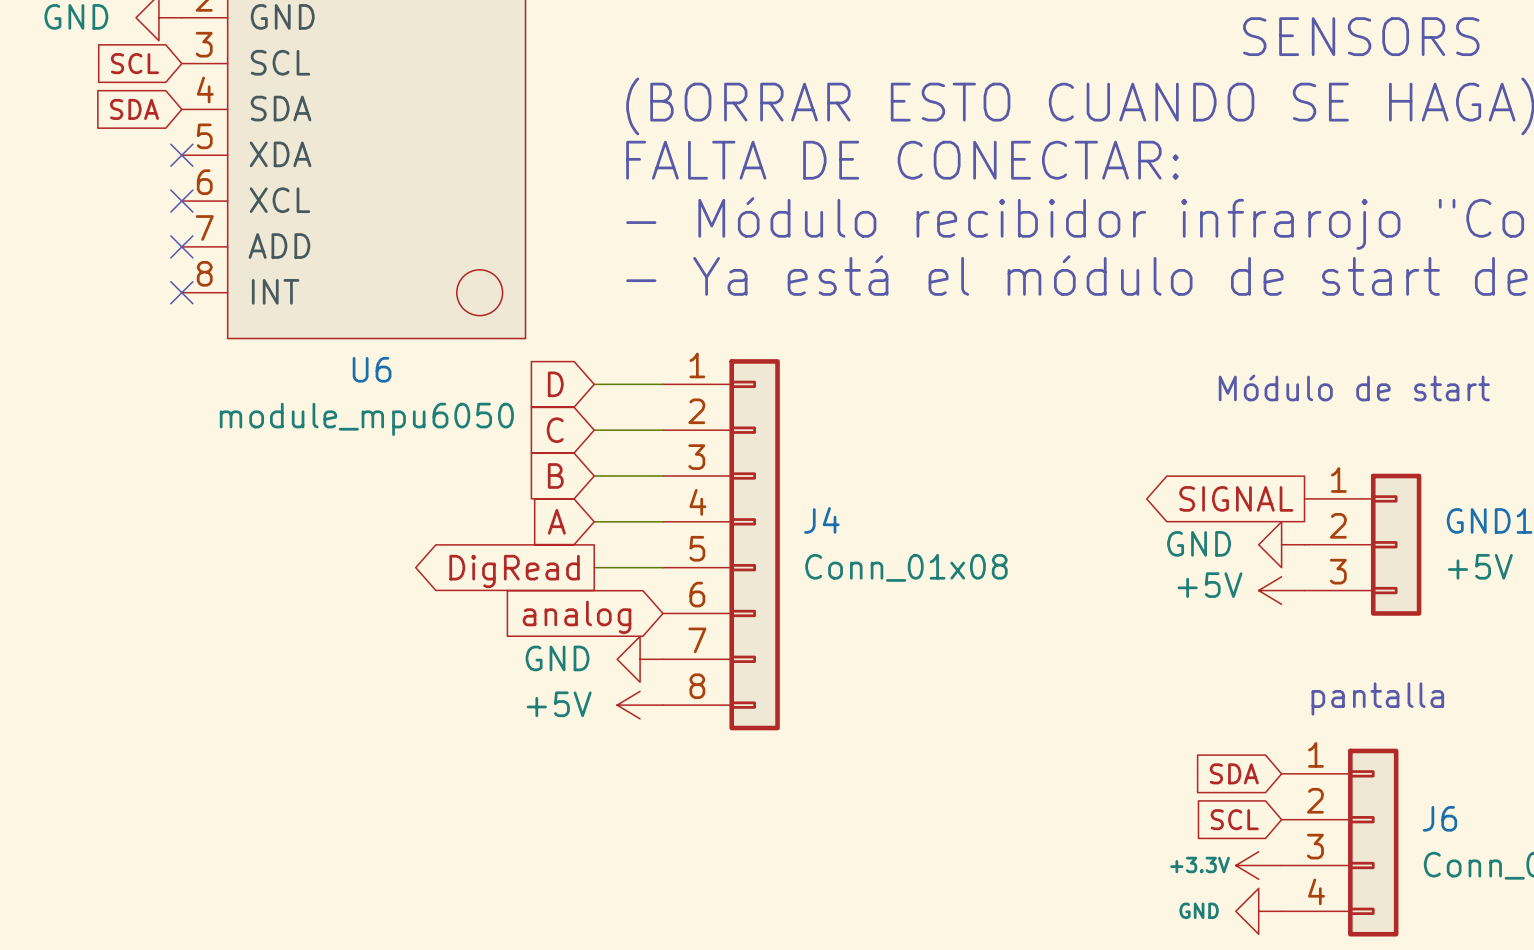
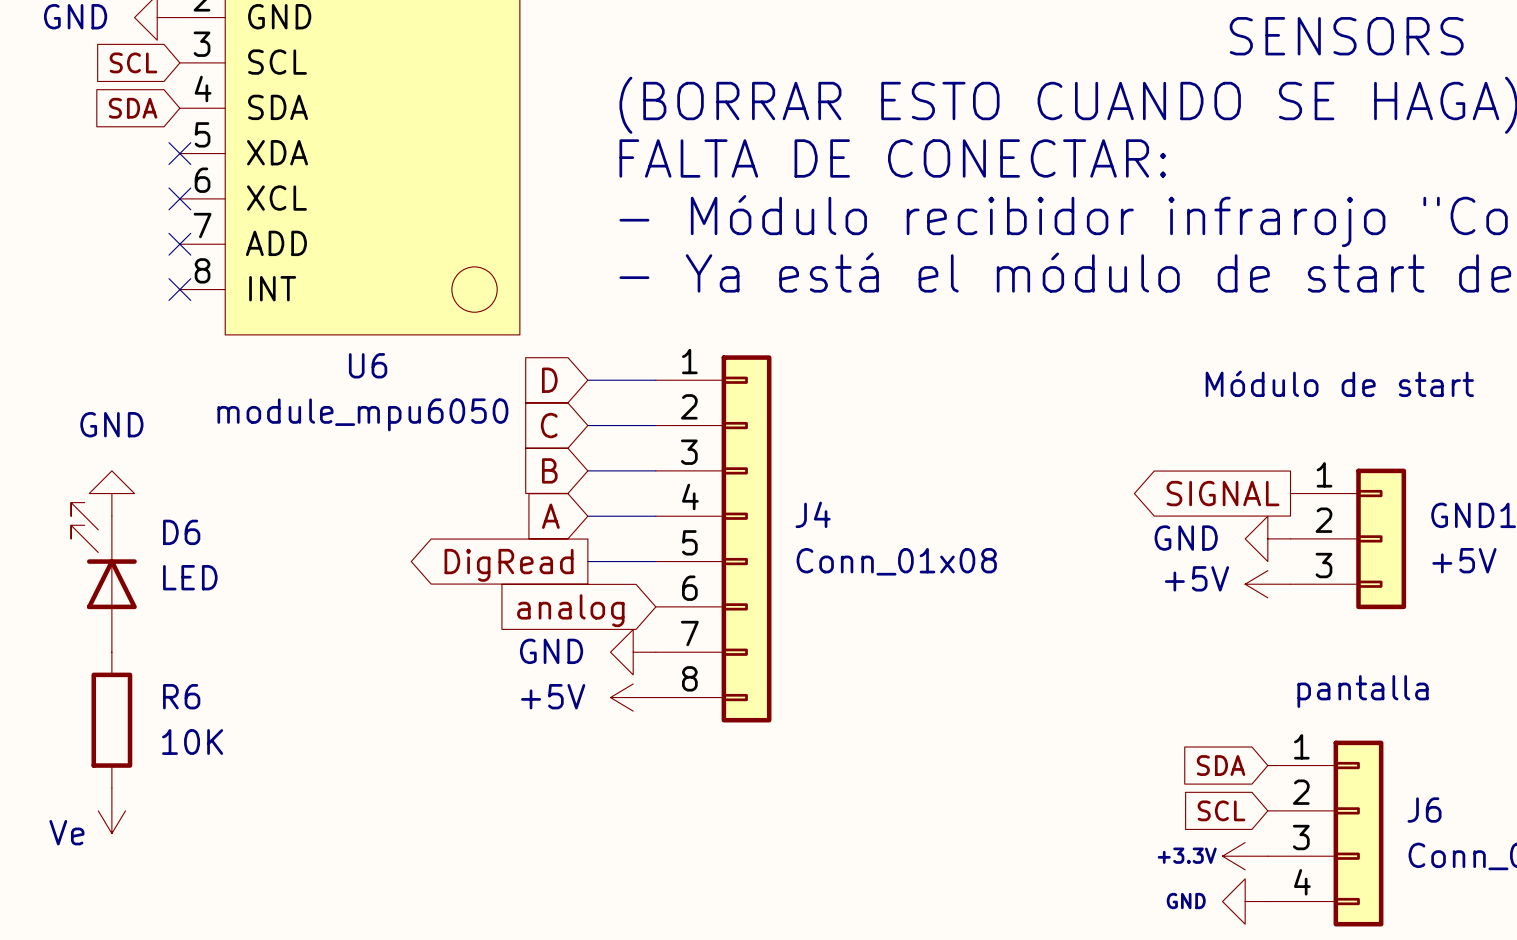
power symbol: none -> GND (111, 493)
D6: none -> LED (103, 577)
R6: none -> 10K (111, 720)
power symbol: none -> Ve (111, 810)

